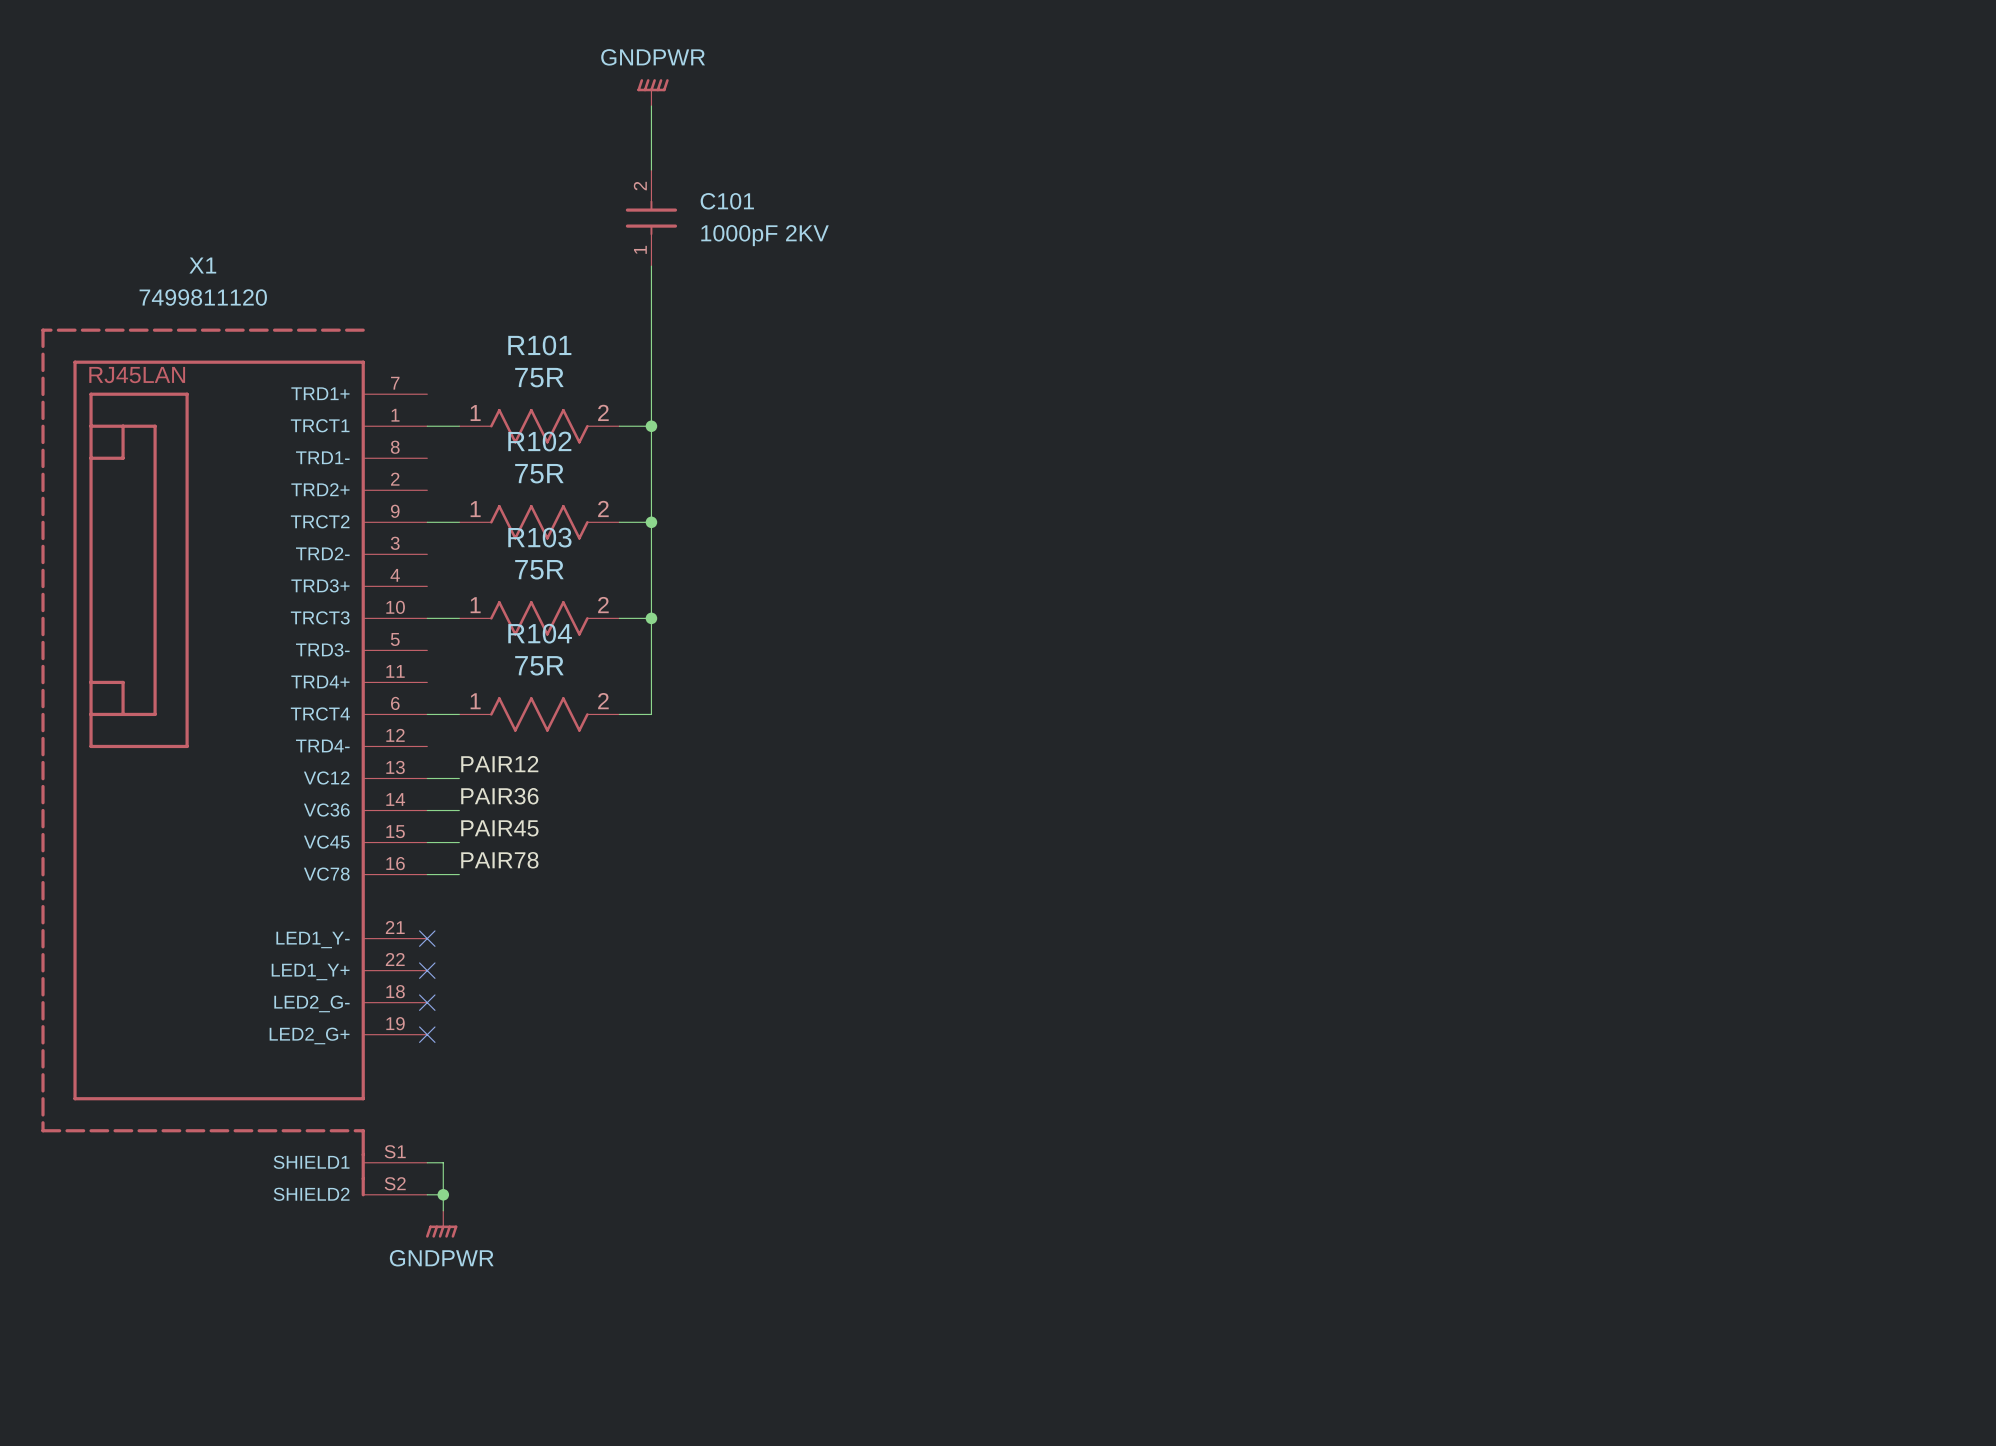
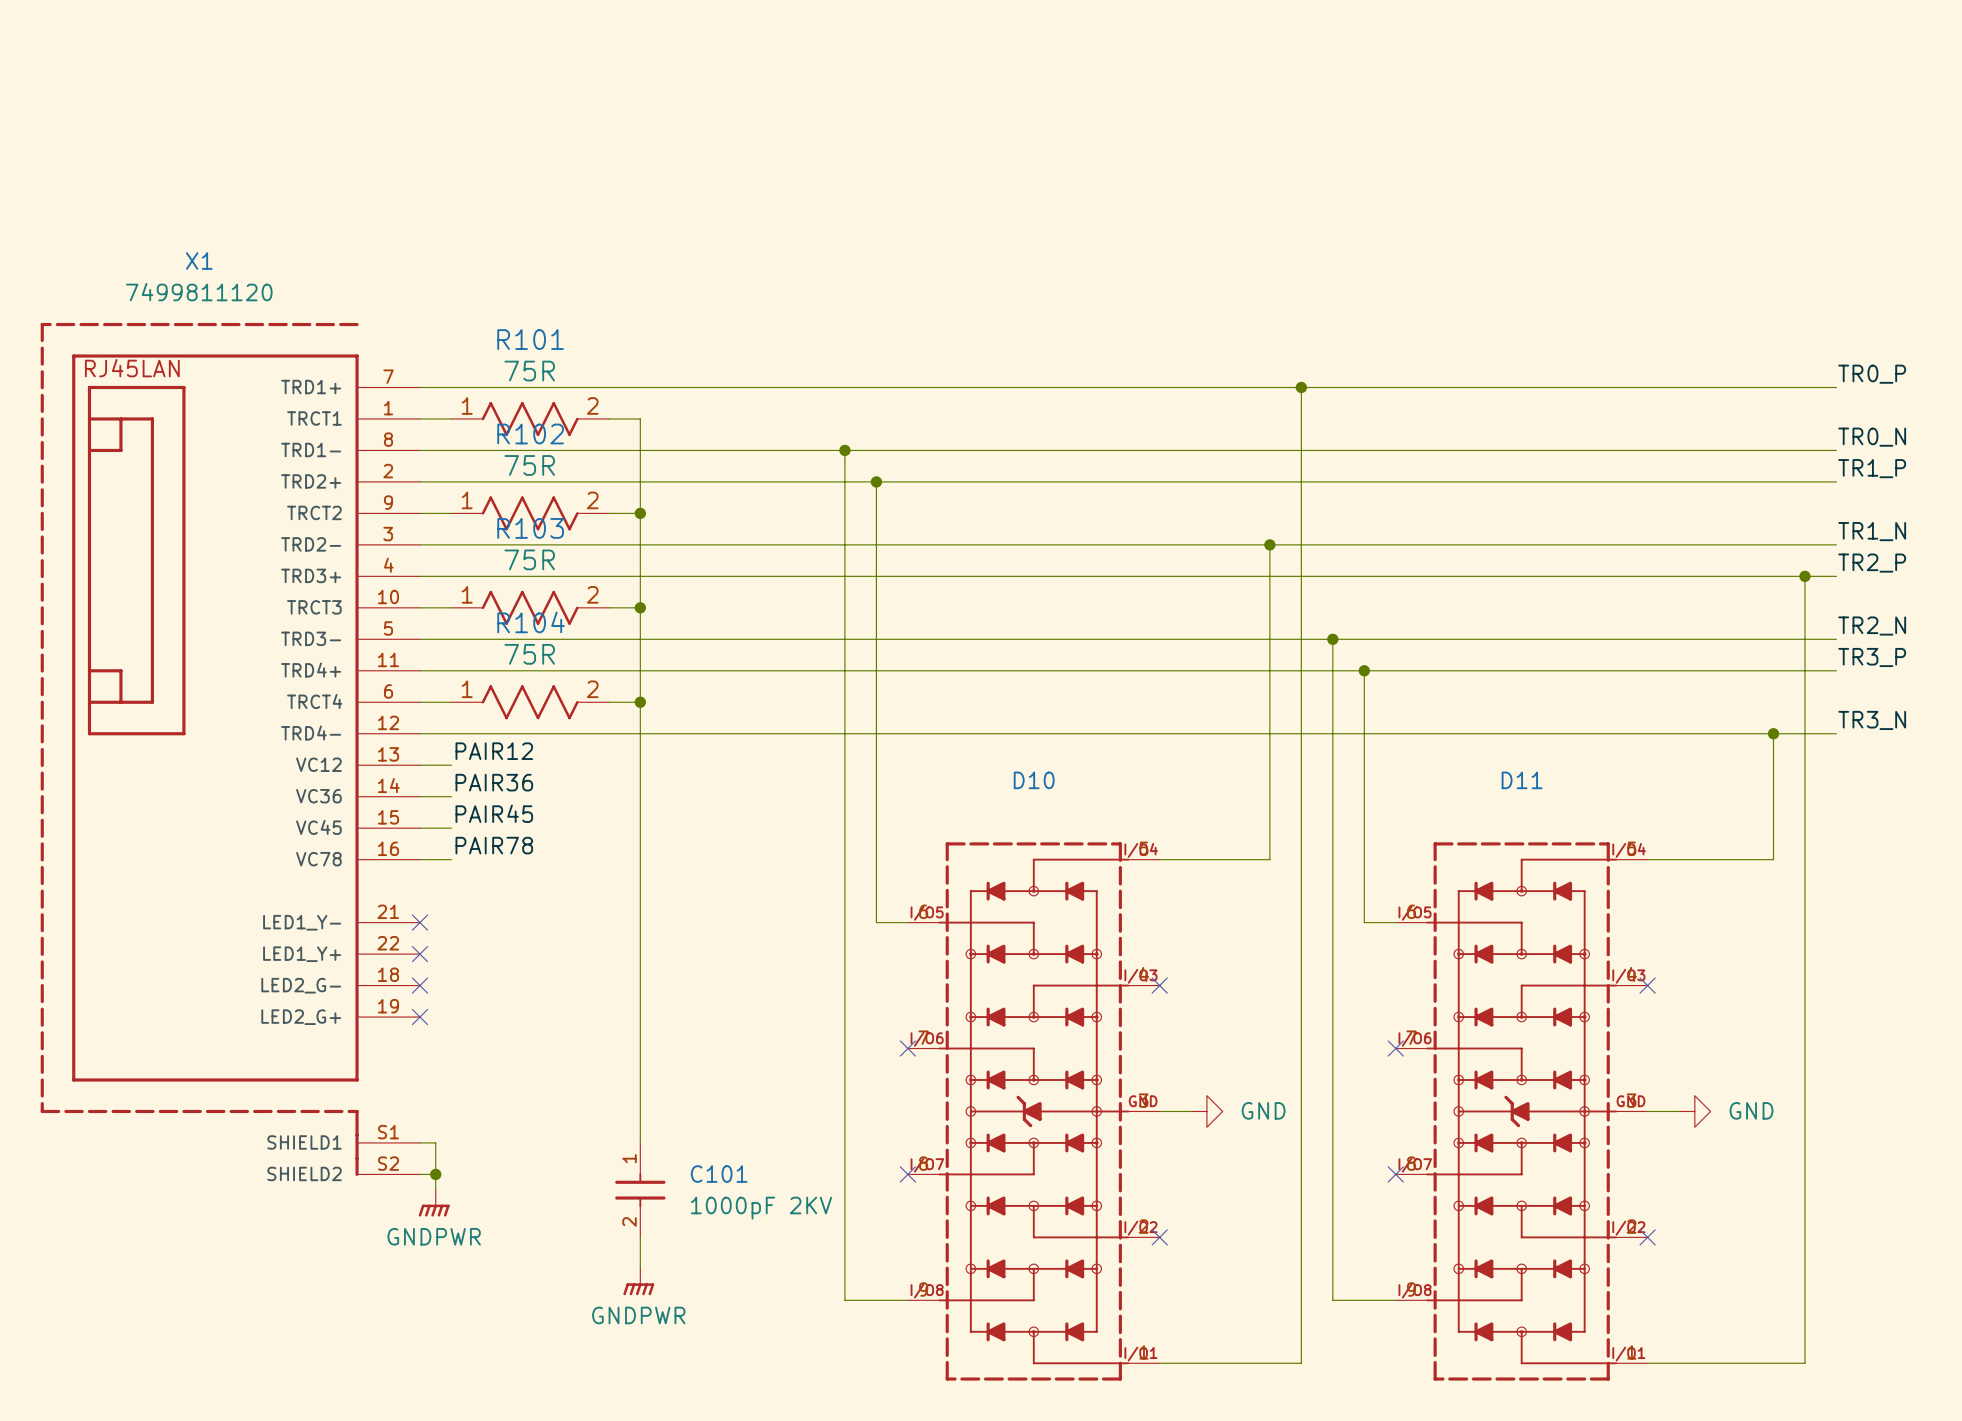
power symbol: GNDPWR (653, 92) -> none
wire: (651, 106) (651, 170) -> none
C101 rotation: 0° (651, 217) -> 180° (640, 1190)
C101 position: (651, 218) -> (640, 1190)
wire: (651, 266) (651, 426) -> none
label: none -> TR0_P (1872, 374)
wire: none -> (419, 387) (1836, 387)
wire: none -> (1301, 387) (1301, 1363) (1159, 1363)
junction: none -> (1301, 387)
junction: (651, 426) -> none
label: none -> TR0_N (1872, 437)
wire: none -> (419, 450) (1836, 450)
wire: none -> (844, 450) (844, 1300) (907, 1300)
junction: none -> (844, 450)
label: none -> TR1_P (1872, 468)
wire: none -> (419, 481) (1836, 481)
wire: none -> (876, 481) (876, 922) (907, 922)
junction: none -> (876, 481)
label: none -> TR1_N (1872, 531)
wire: none -> (419, 544) (1836, 544)
wire: none -> (1269, 544) (1269, 859) (1159, 859)
junction: none -> (1269, 544)
label: none -> TR2_P (1872, 563)
wire: none -> (419, 576) (1836, 576)
wire: none -> (1804, 576) (1804, 1363) (1647, 1363)
junction: none -> (1804, 576)
label: none -> TR2_N (1872, 626)
wire: none -> (419, 639) (1836, 639)
wire: none -> (1332, 639) (1332, 1300) (1395, 1300)
junction: none -> (1332, 639)
label: none -> TR3_P (1872, 657)
wire: none -> (419, 670) (1836, 670)
wire: none -> (1364, 670) (1364, 922) (1395, 922)
junction: none -> (1364, 670)
wire: none -> (640, 702) (640, 1142)
junction: none -> (640, 702)
label: none -> TR3_N (1872, 720)
wire: none -> (419, 733) (1836, 733)
wire: none -> (1773, 733) (1773, 859) (1647, 859)
junction: none -> (1773, 733)
no-connect mark: none -> (1159, 985)
no-connect mark: none -> (1647, 985)
no-connect mark: none -> (907, 1048)
no-connect mark: none -> (1395, 1048)
D10: none -> (1033, 1111)
wire: none -> (1159, 1111) (1191, 1111)
power symbol: none -> GND (1206, 1111)
D11: none -> (1521, 1111)
wire: none -> (1647, 1111) (1679, 1111)
power symbol: none -> GND (1694, 1111)
no-connect mark: none -> (907, 1174)
no-connect mark: none -> (1395, 1174)
wire: none -> (640, 1237) (640, 1268)
no-connect mark: none -> (1159, 1237)
no-connect mark: none -> (1647, 1237)
power symbol: none -> GNDPWR (638, 1282)

